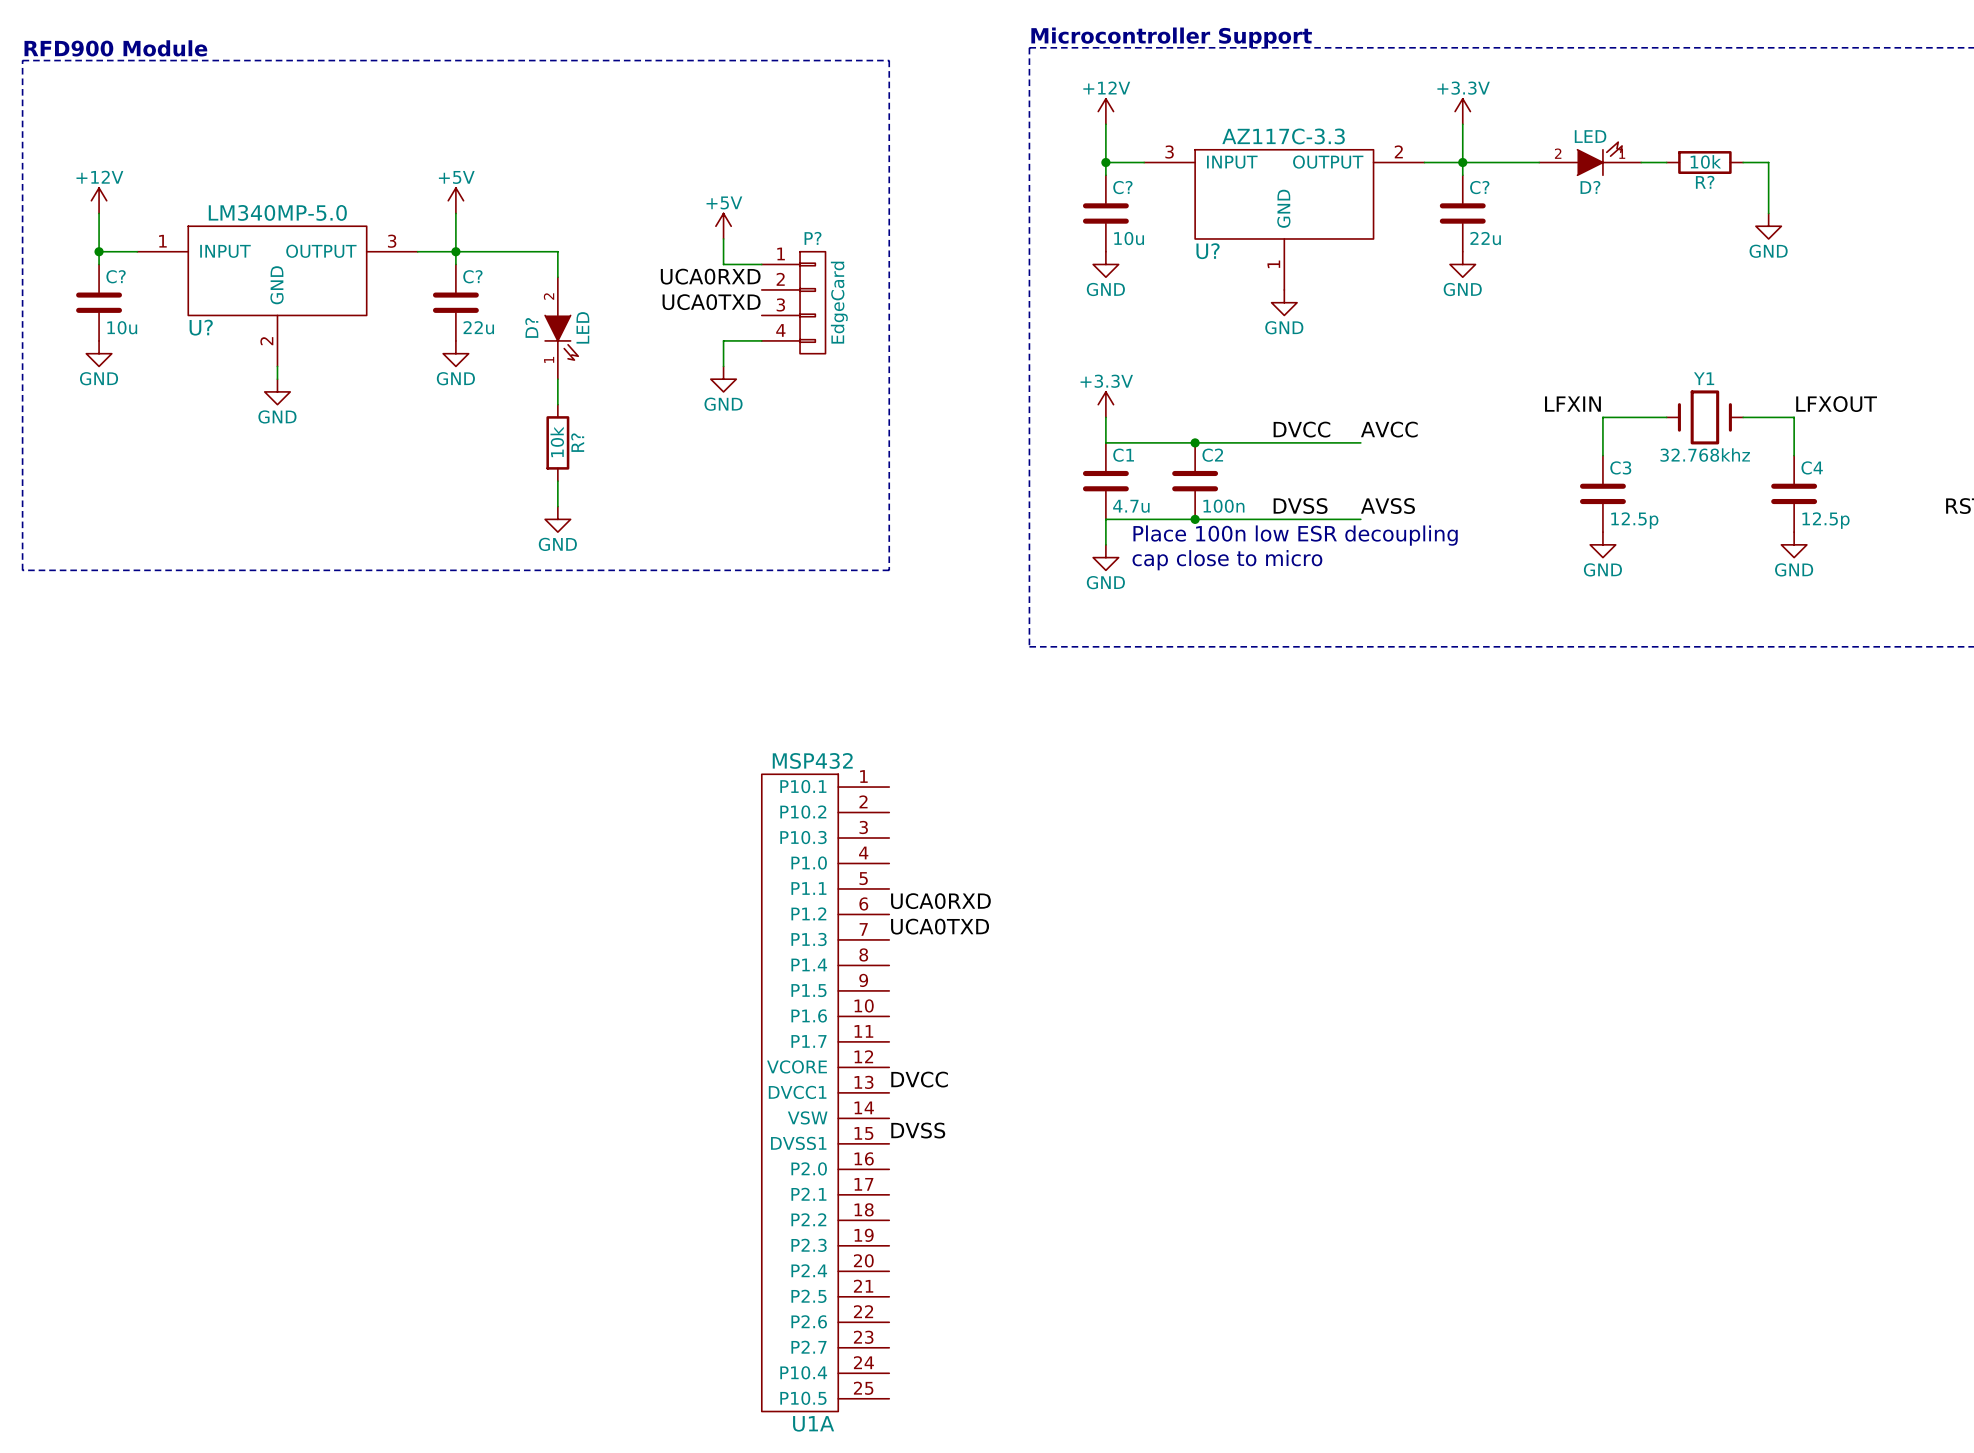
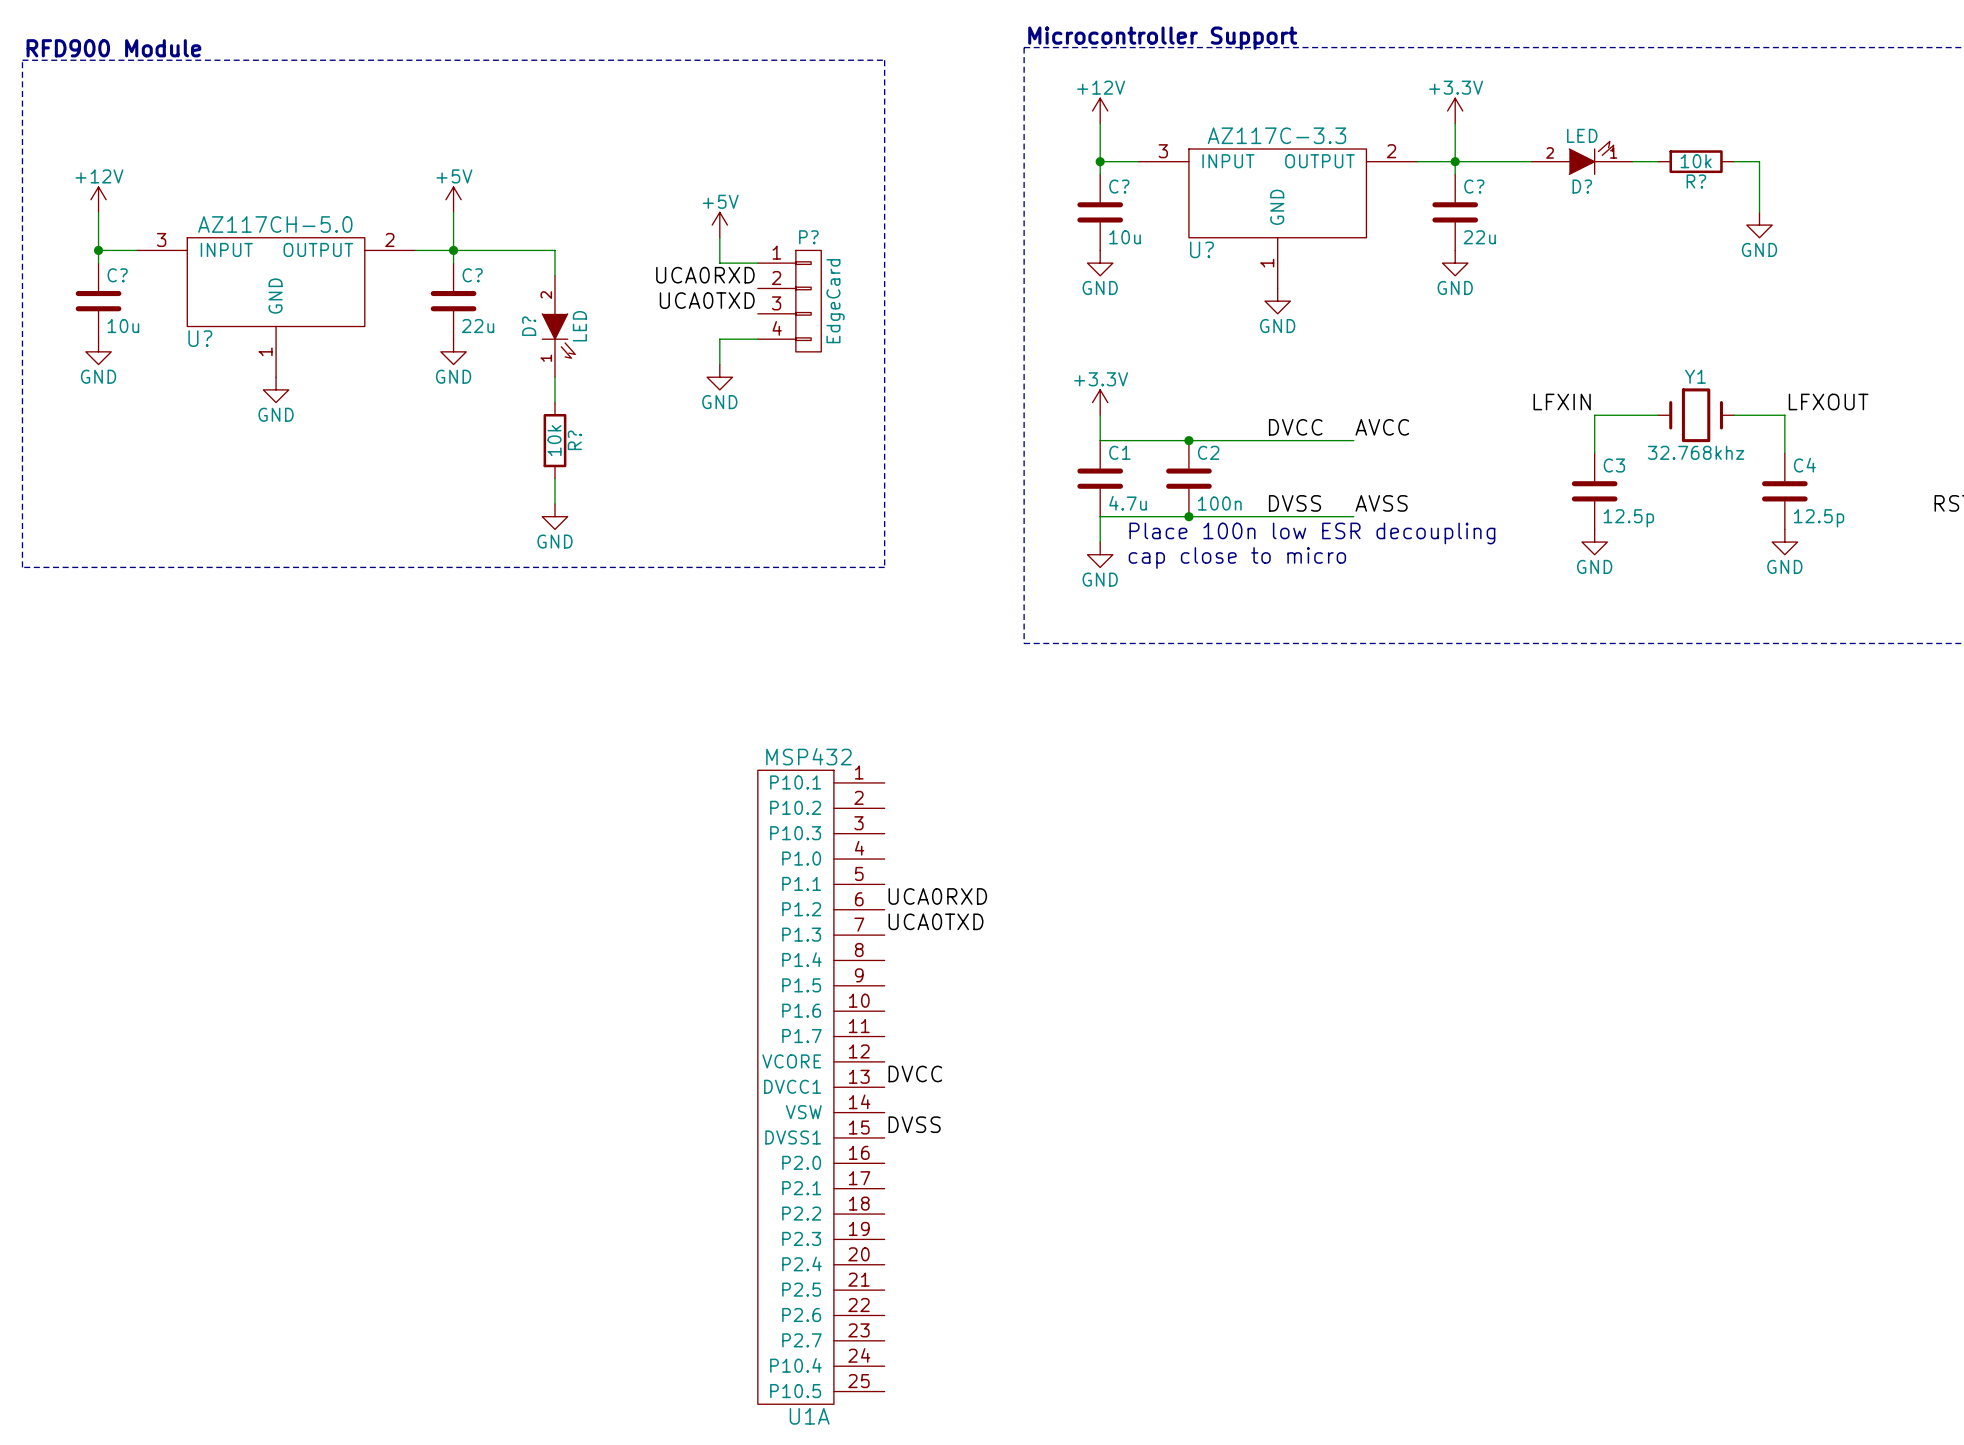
U?: LM340MP-5.0 (277, 296) -> none
U?: none -> AZ117CH-5.0 (276, 307)

